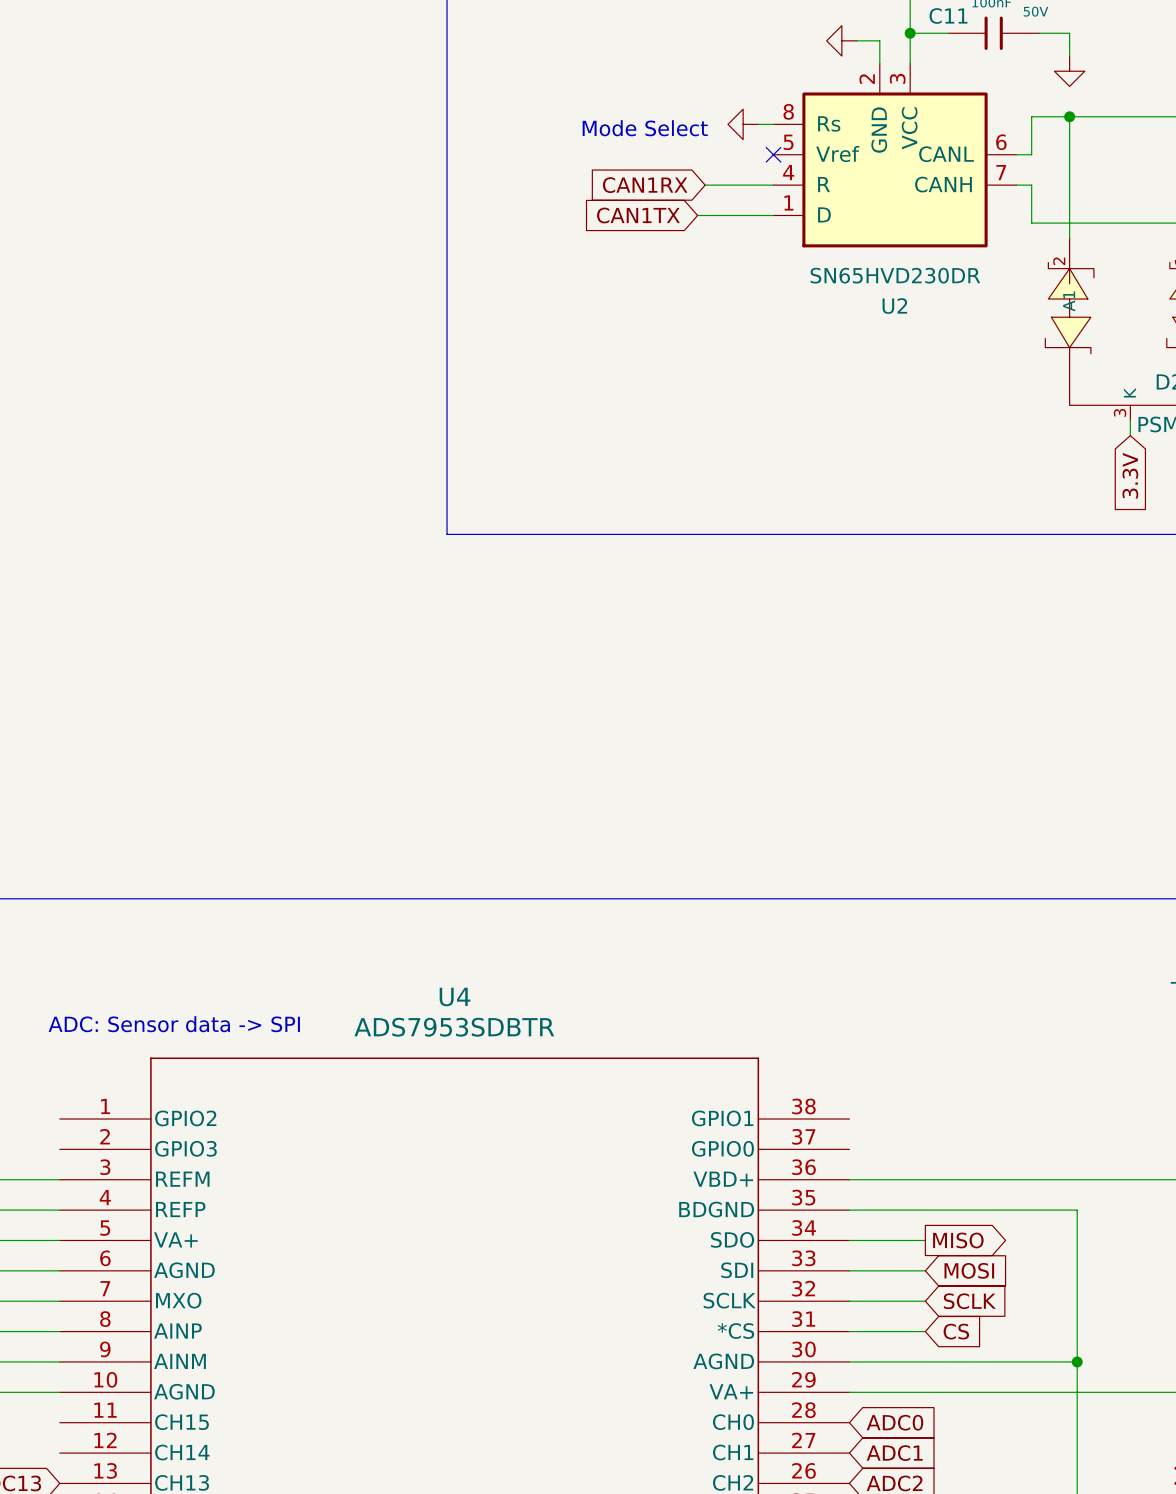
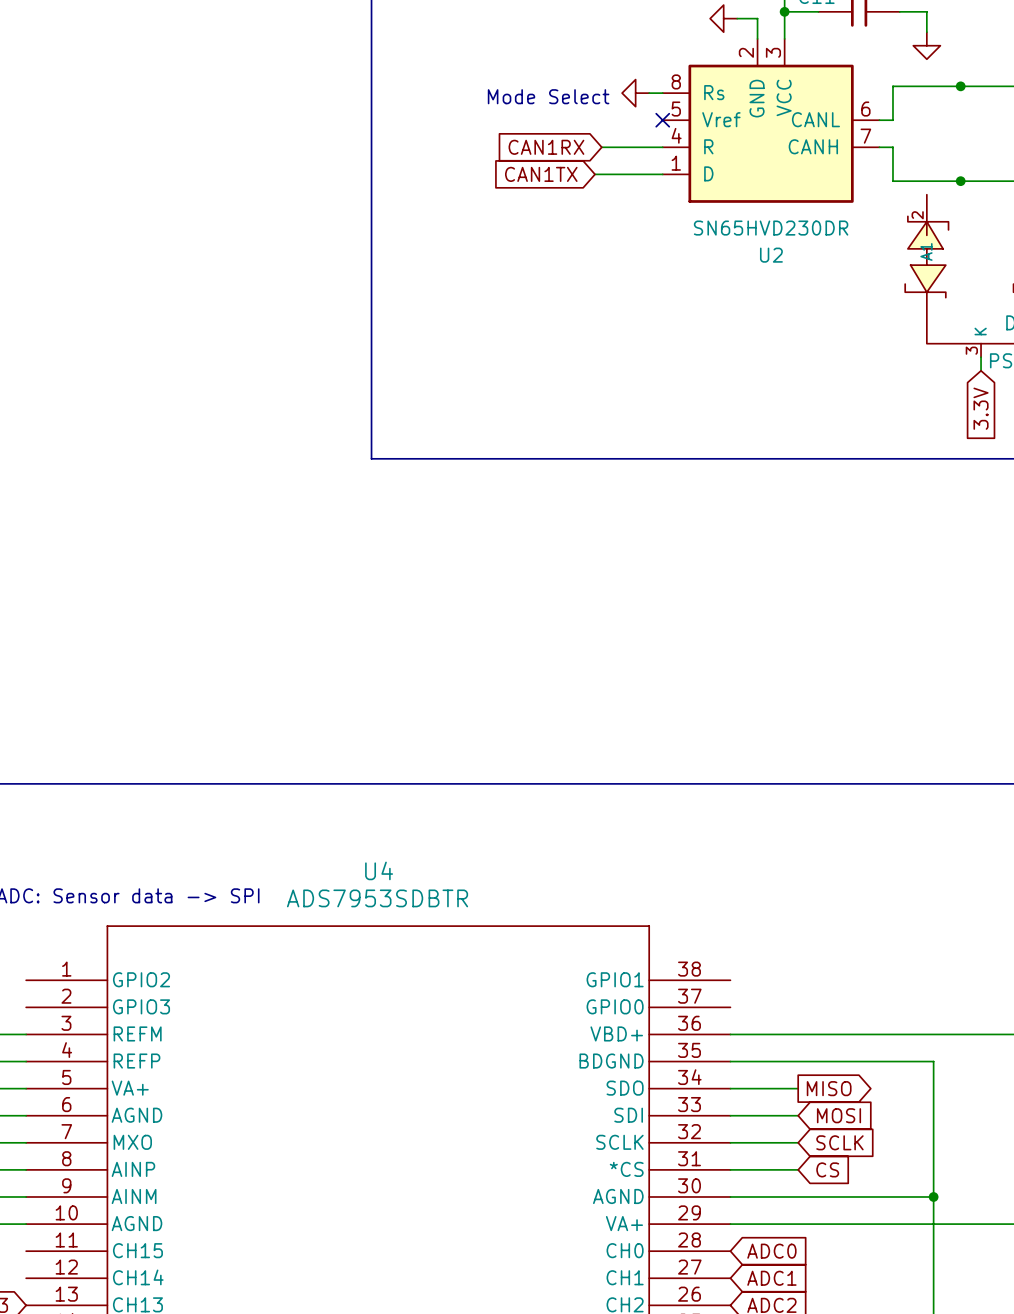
wire: (1069, 116) (1069, 238) -> none
junction position: (1069, 116) -> (960, 86)
junction: none -> (960, 181)

